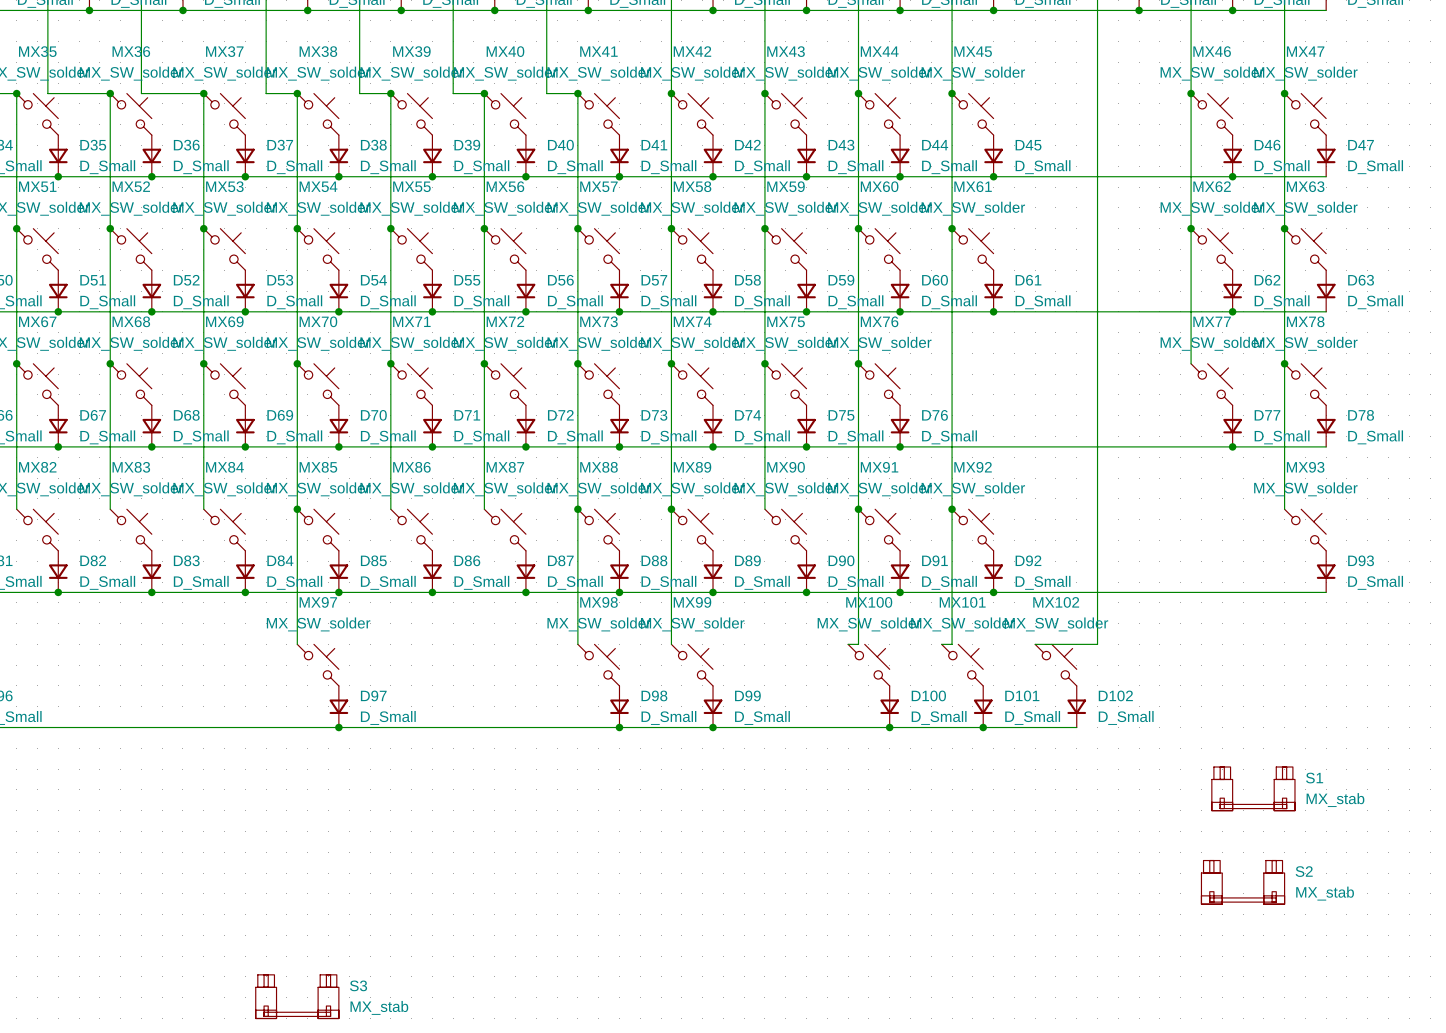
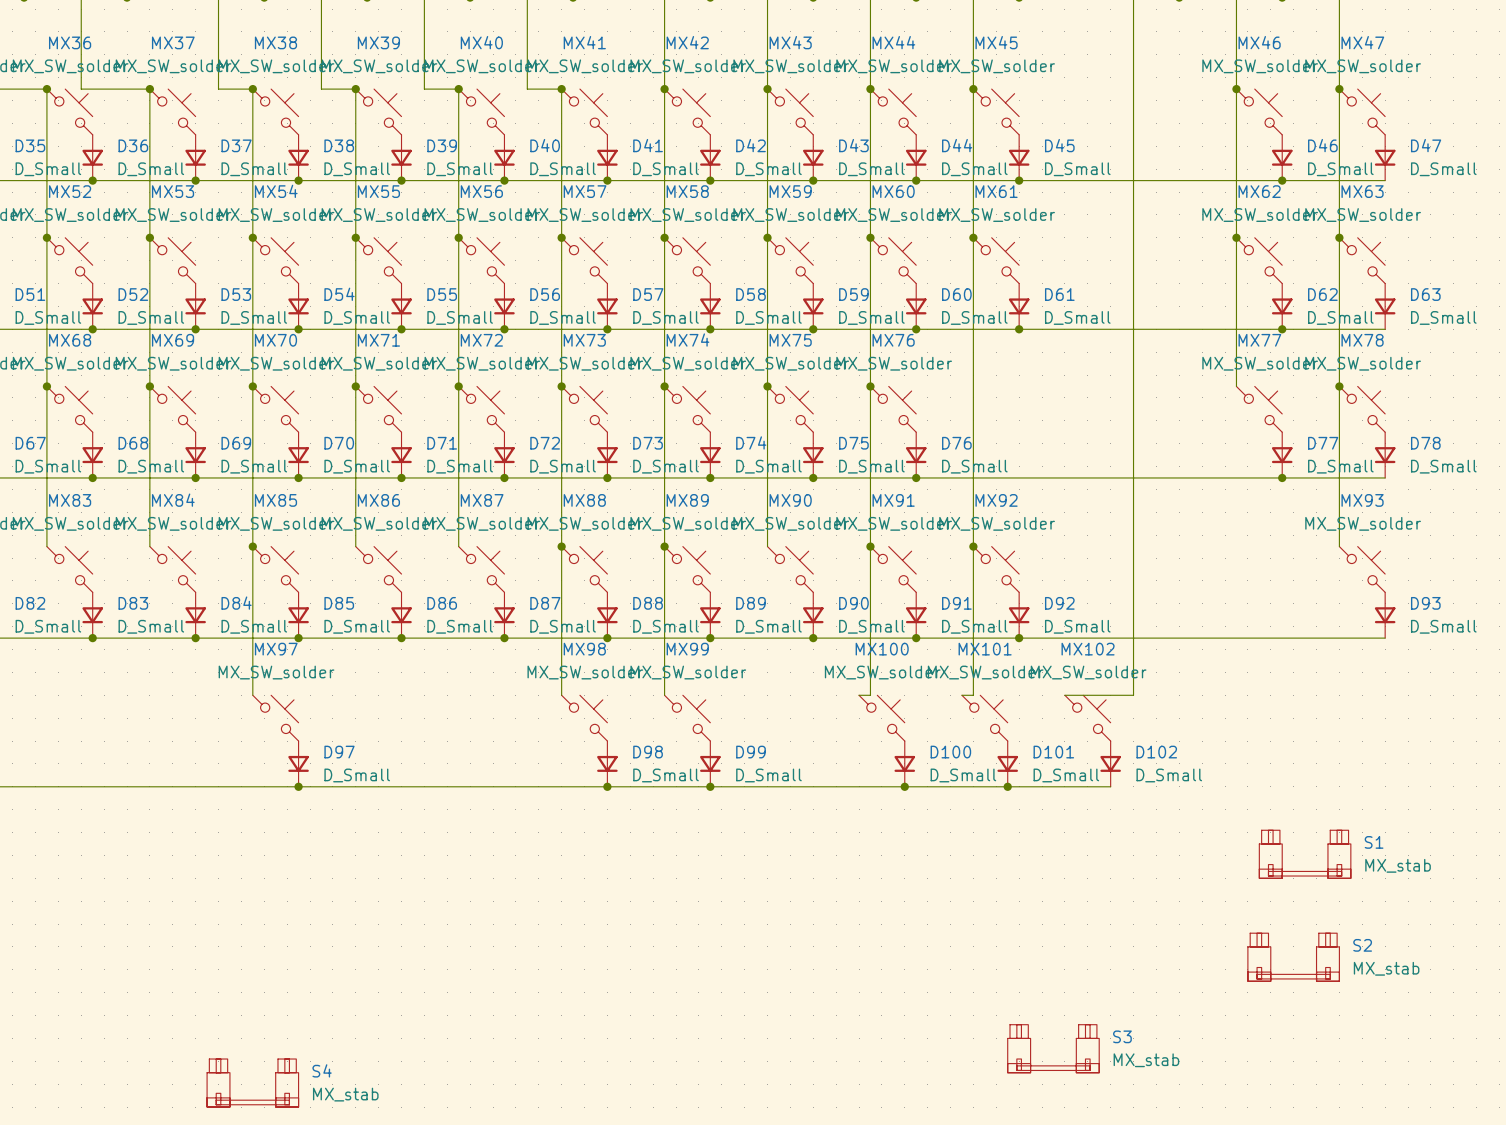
S3: none -> MX_stab (1053, 1048)
S3 name: S3 (358, 985) -> S4 (322, 1070)

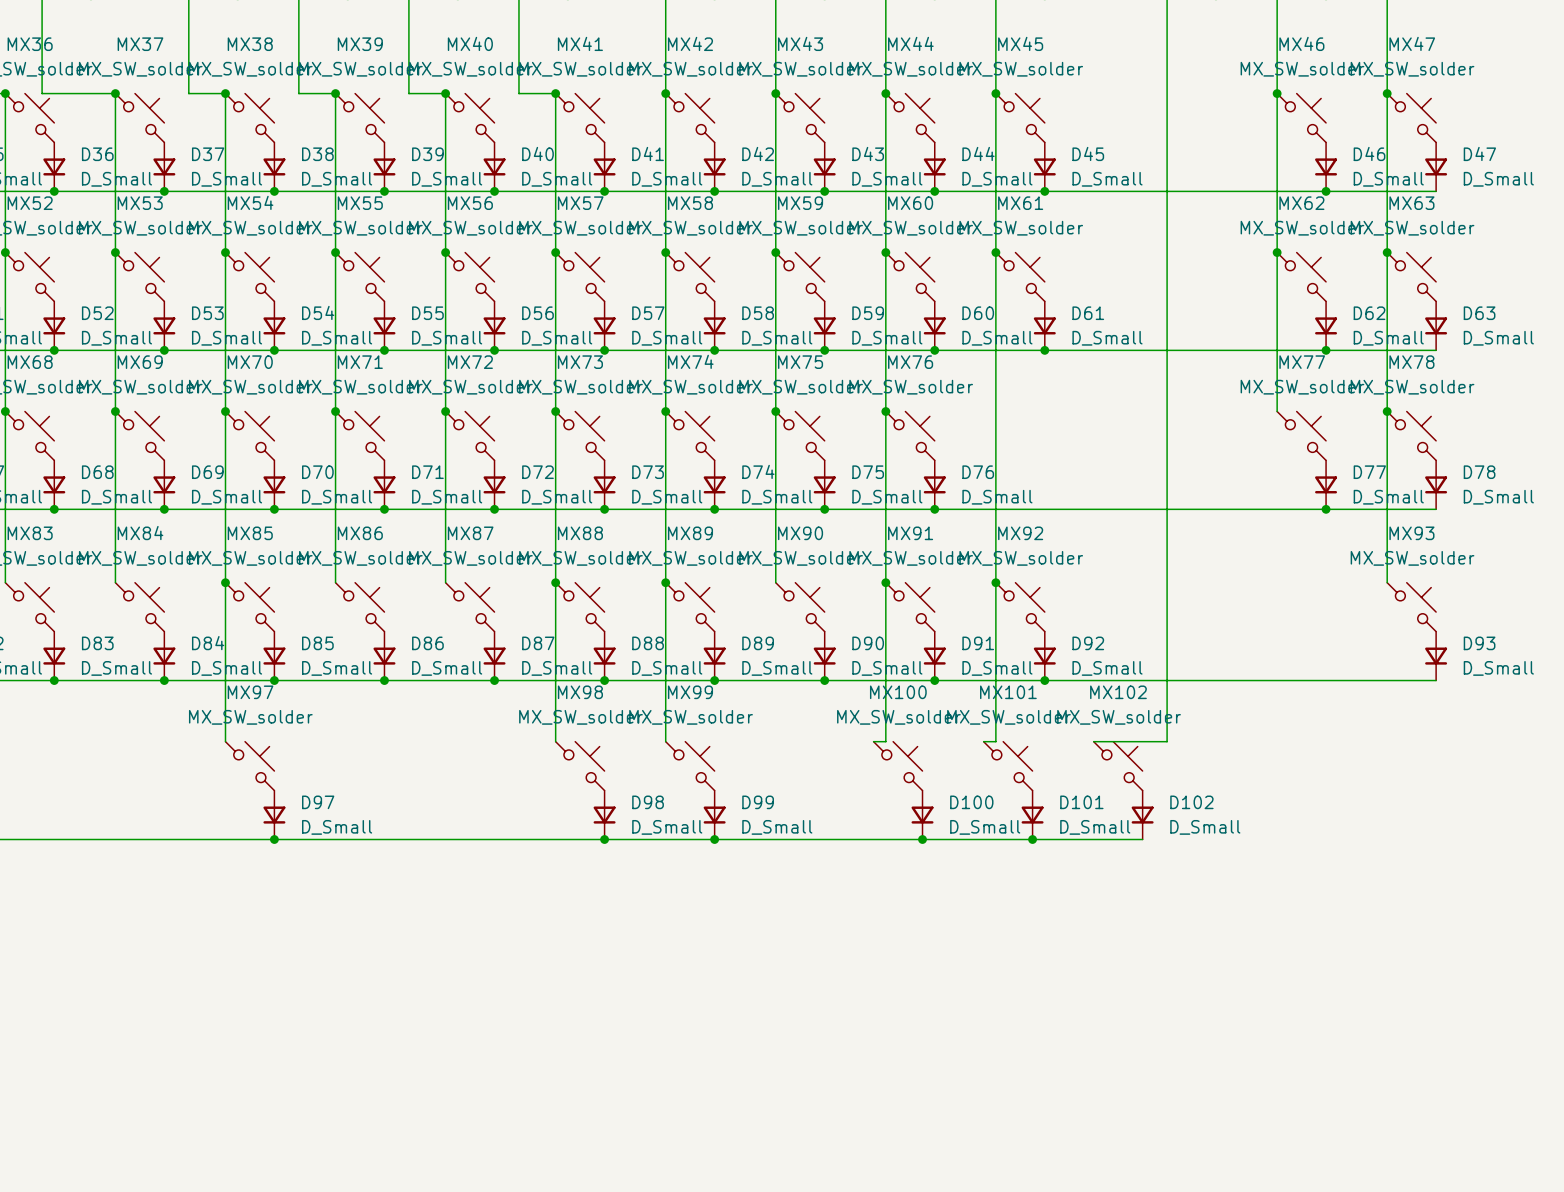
S1: MX_stab (1305, 854) -> none
S2: MX_stab (1293, 957) -> none
S3: MX_stab (1053, 1048) -> none
S4: MX_stab (252, 1083) -> none

